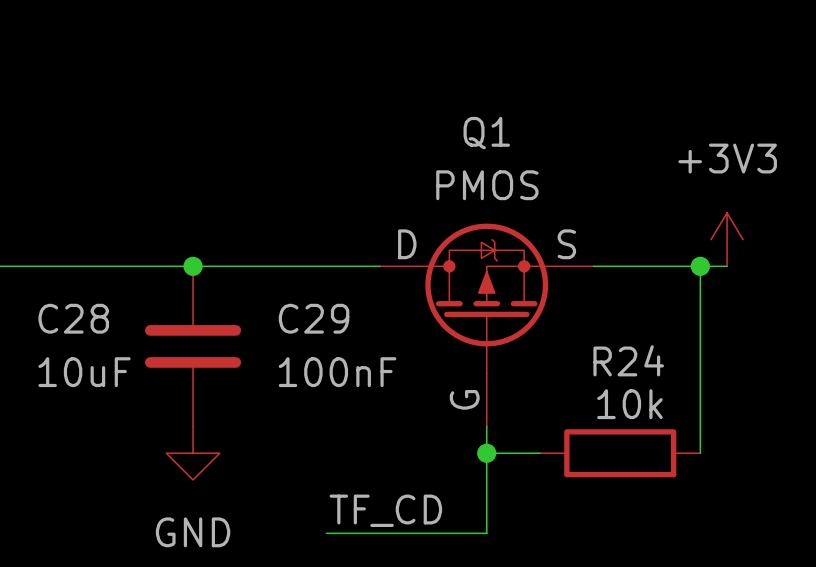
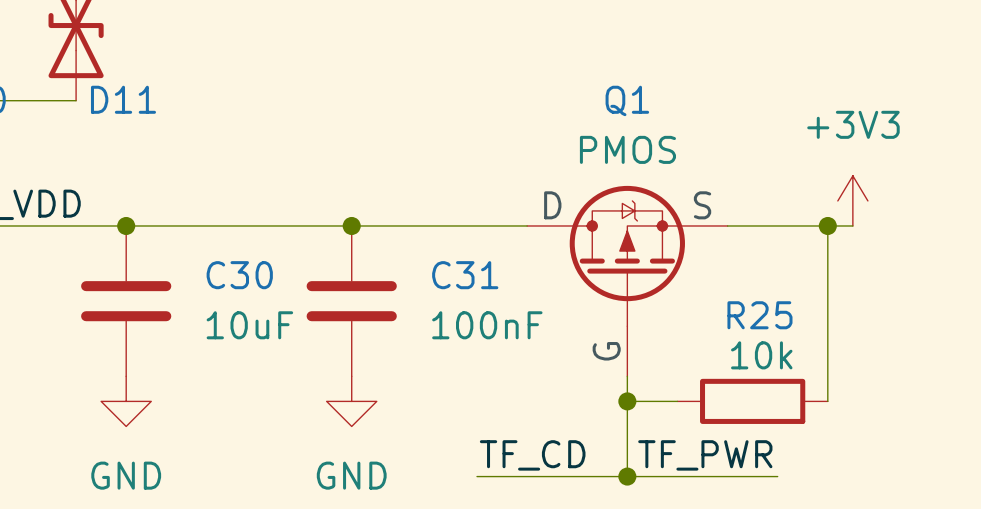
C28 name: C28 (73, 318) -> C30 (239, 275)
C29 name: C29 (314, 318) -> C31 (465, 275)
R24 name: R24 (628, 360) -> R25 (759, 315)
label: none -> TF_PWR (705, 455)
wire: none -> (627, 476) (777, 476)
junction: none -> (627, 476)

